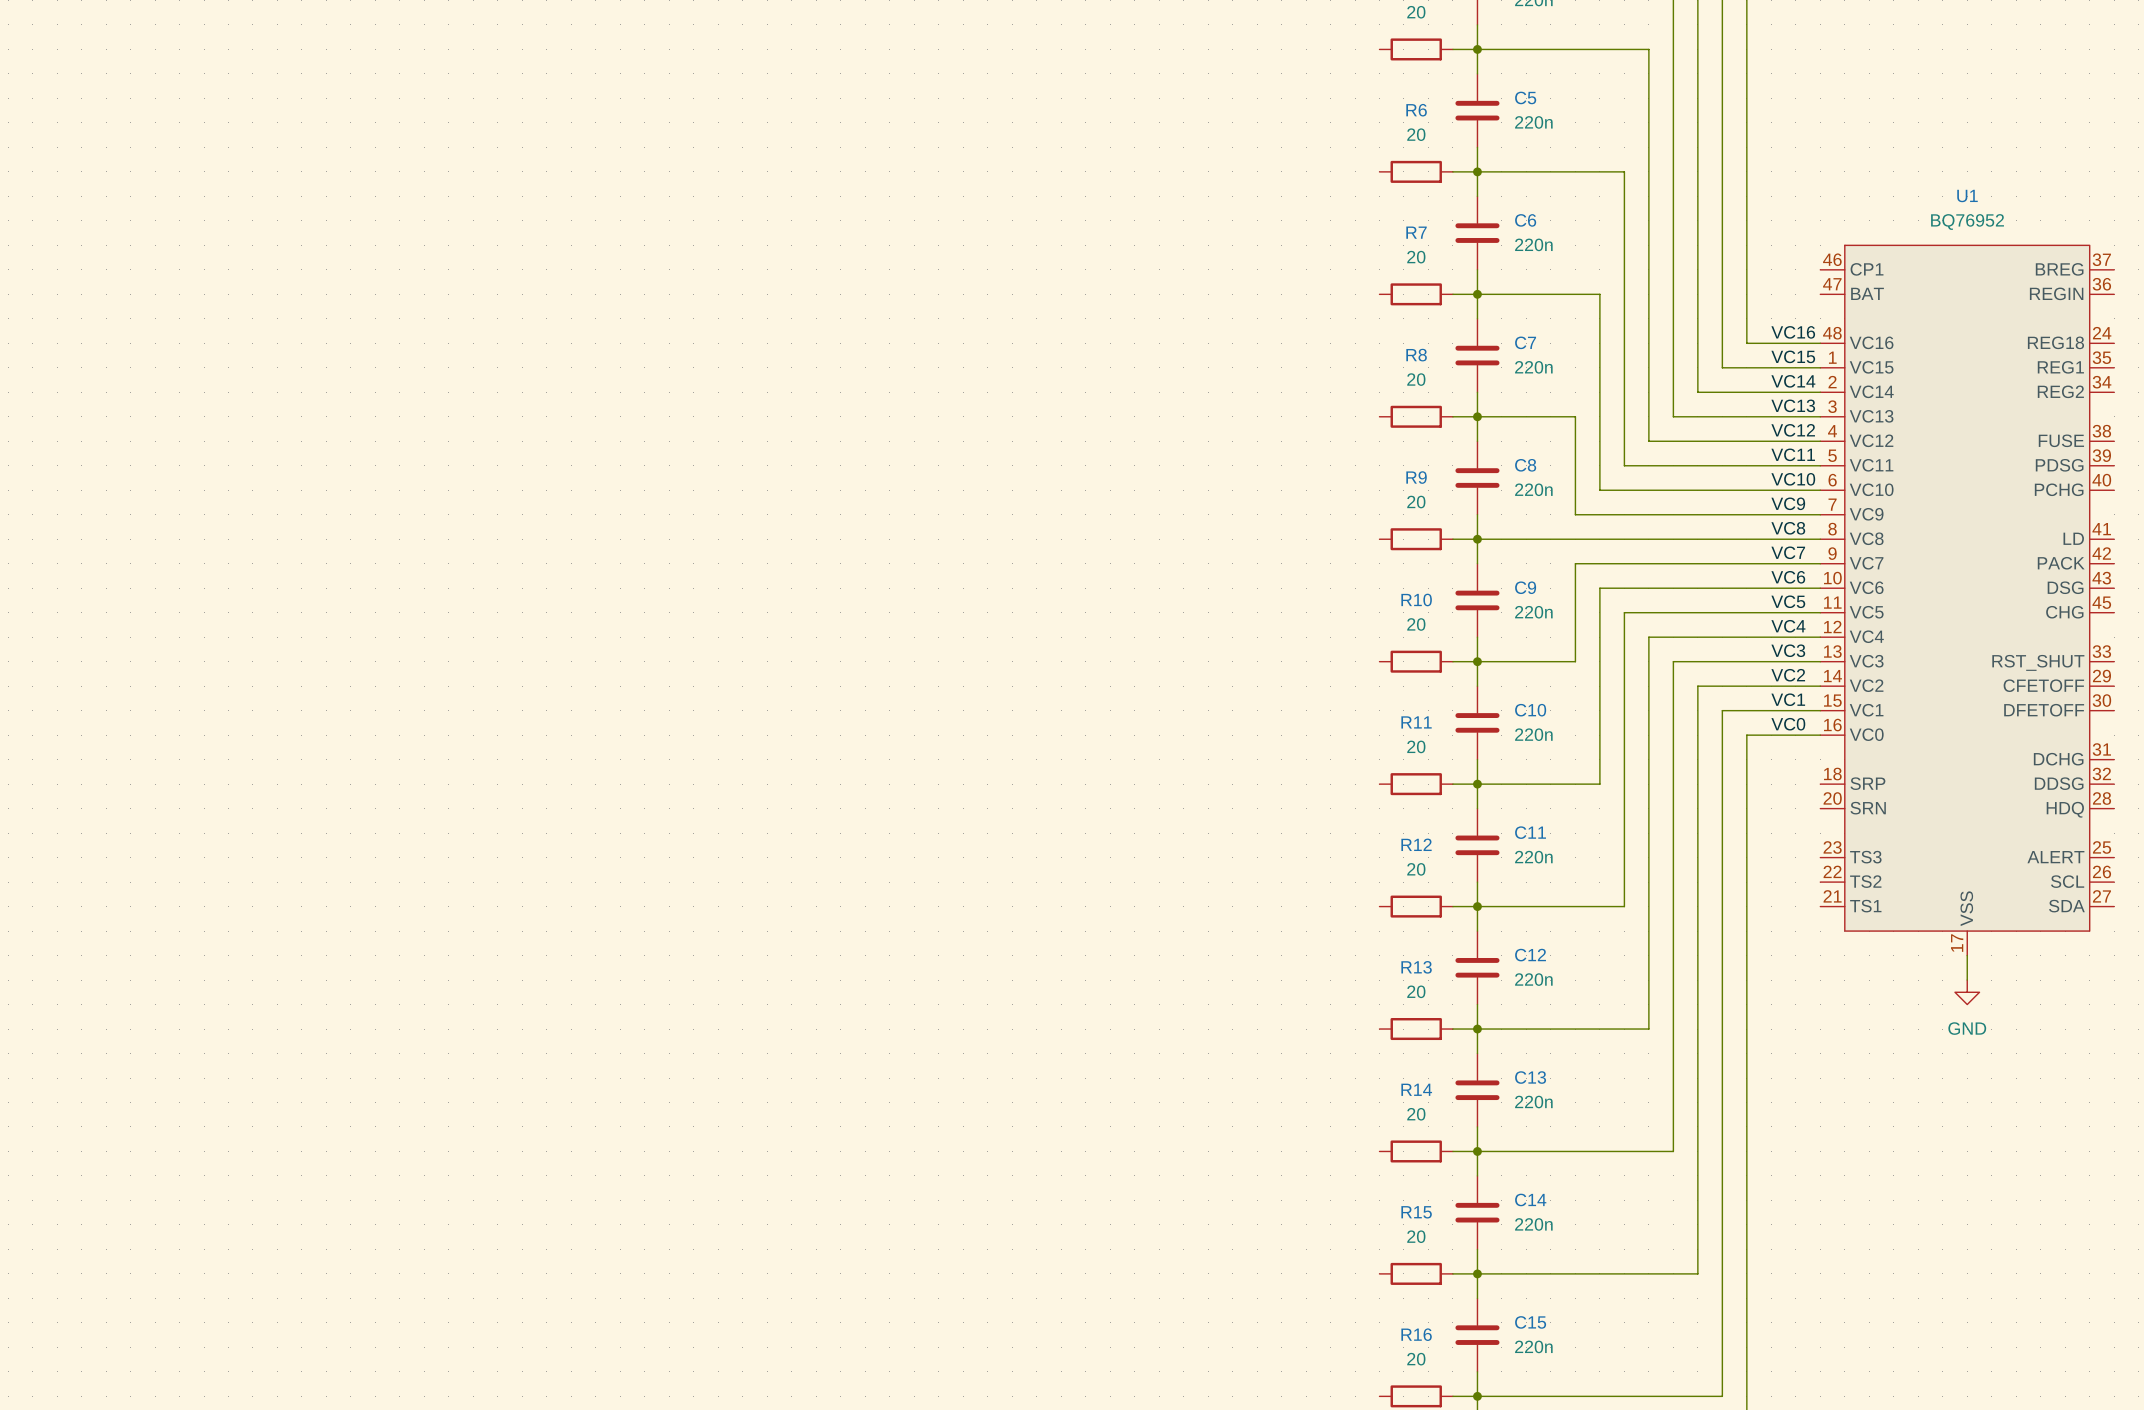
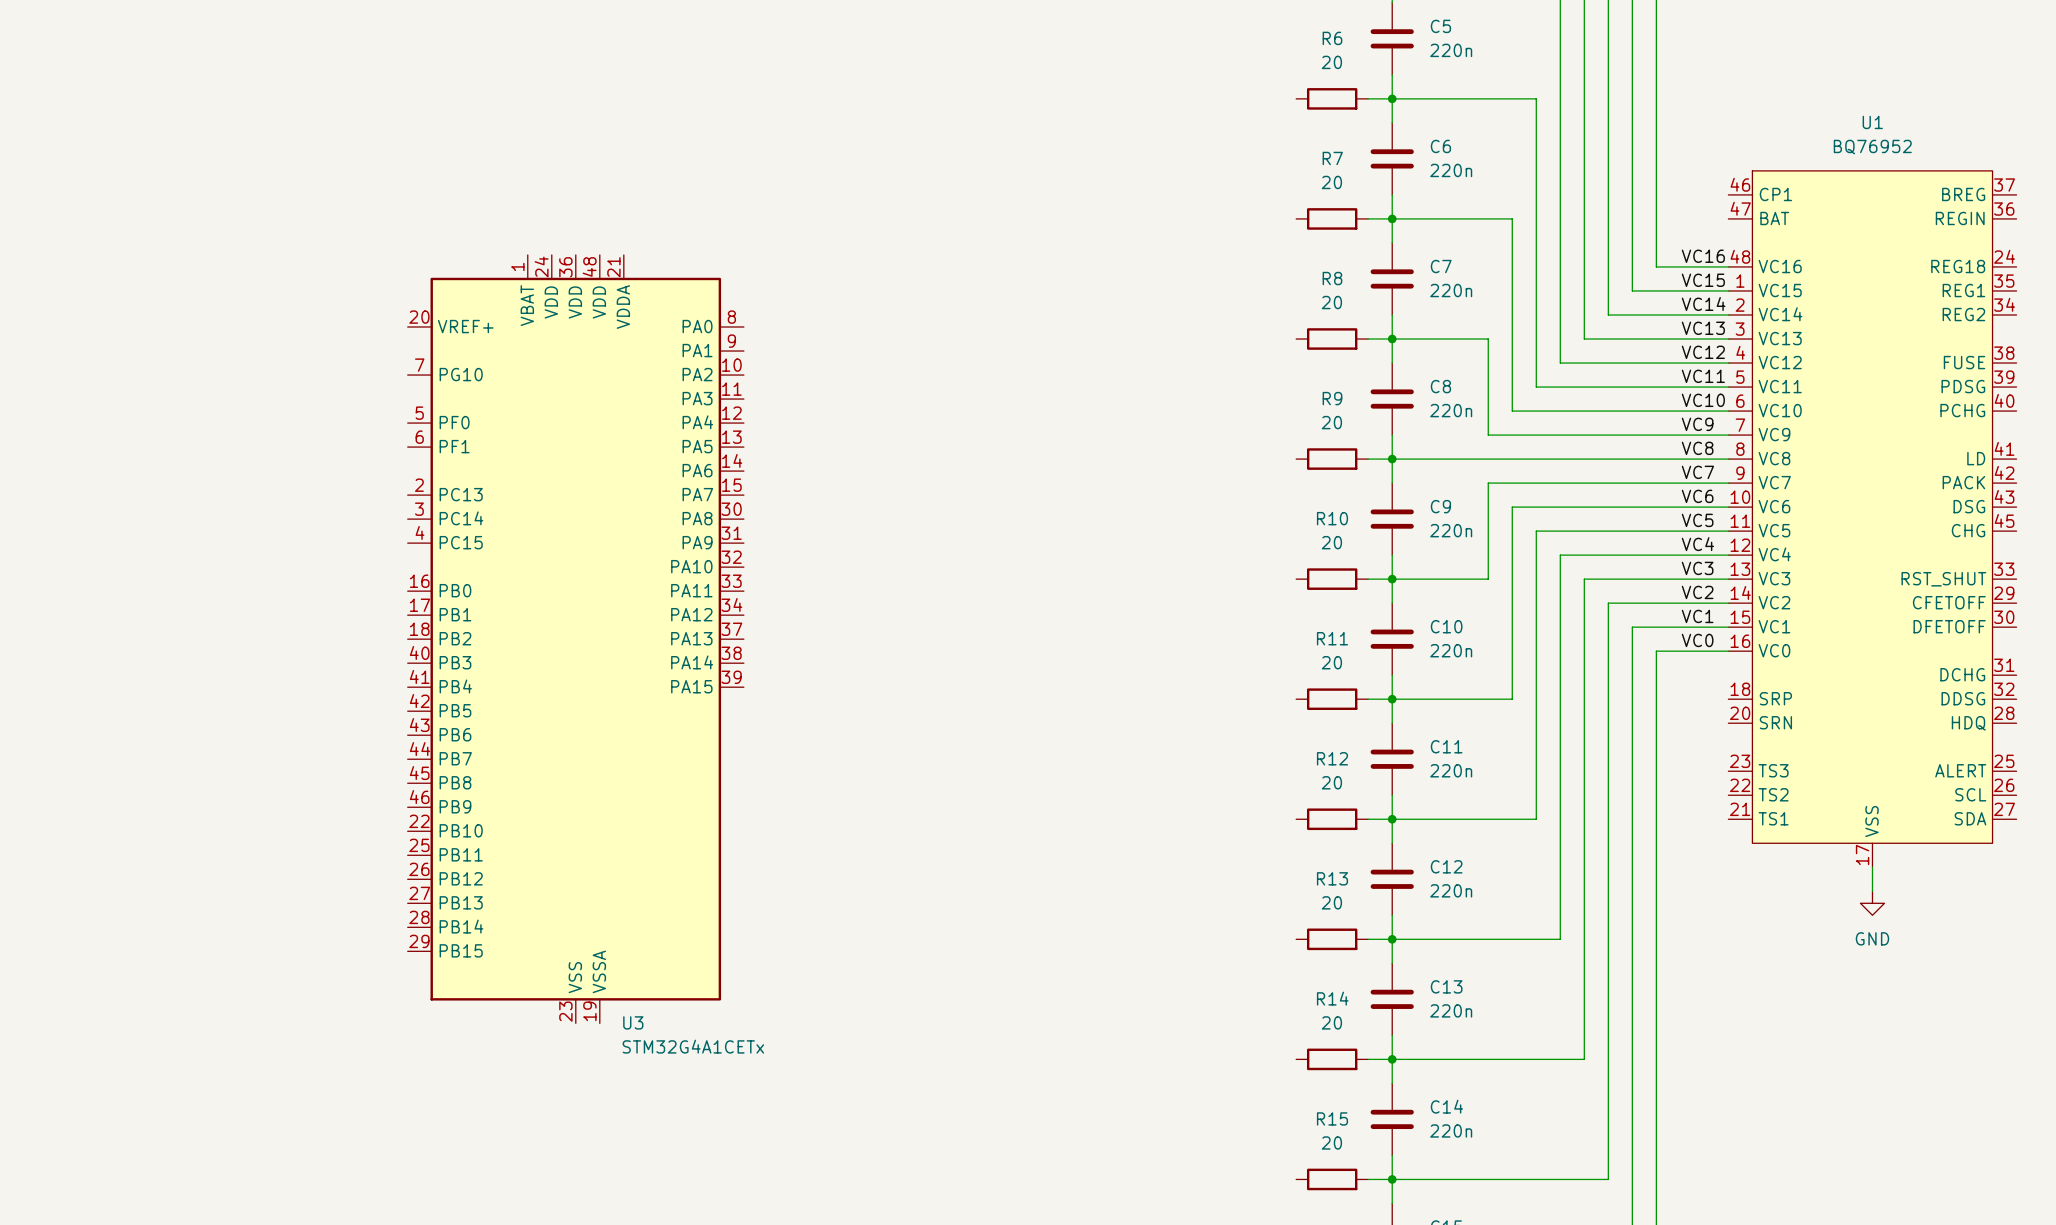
U3: none -> STM32G4A1CETx (575, 639)

